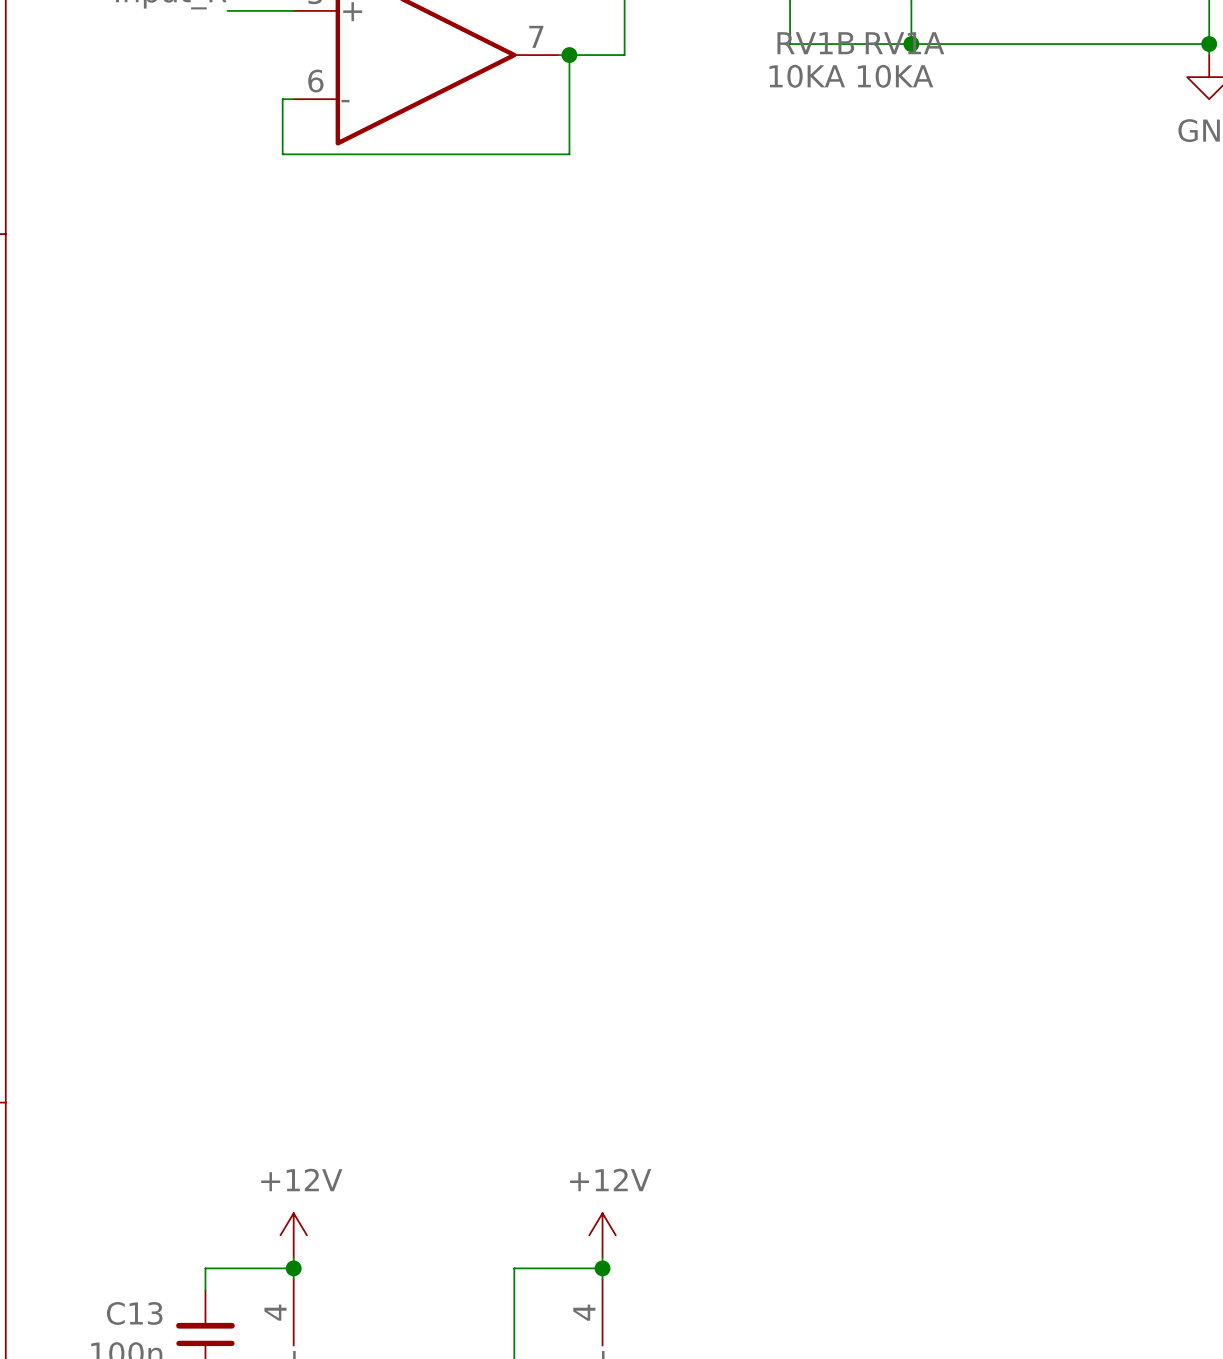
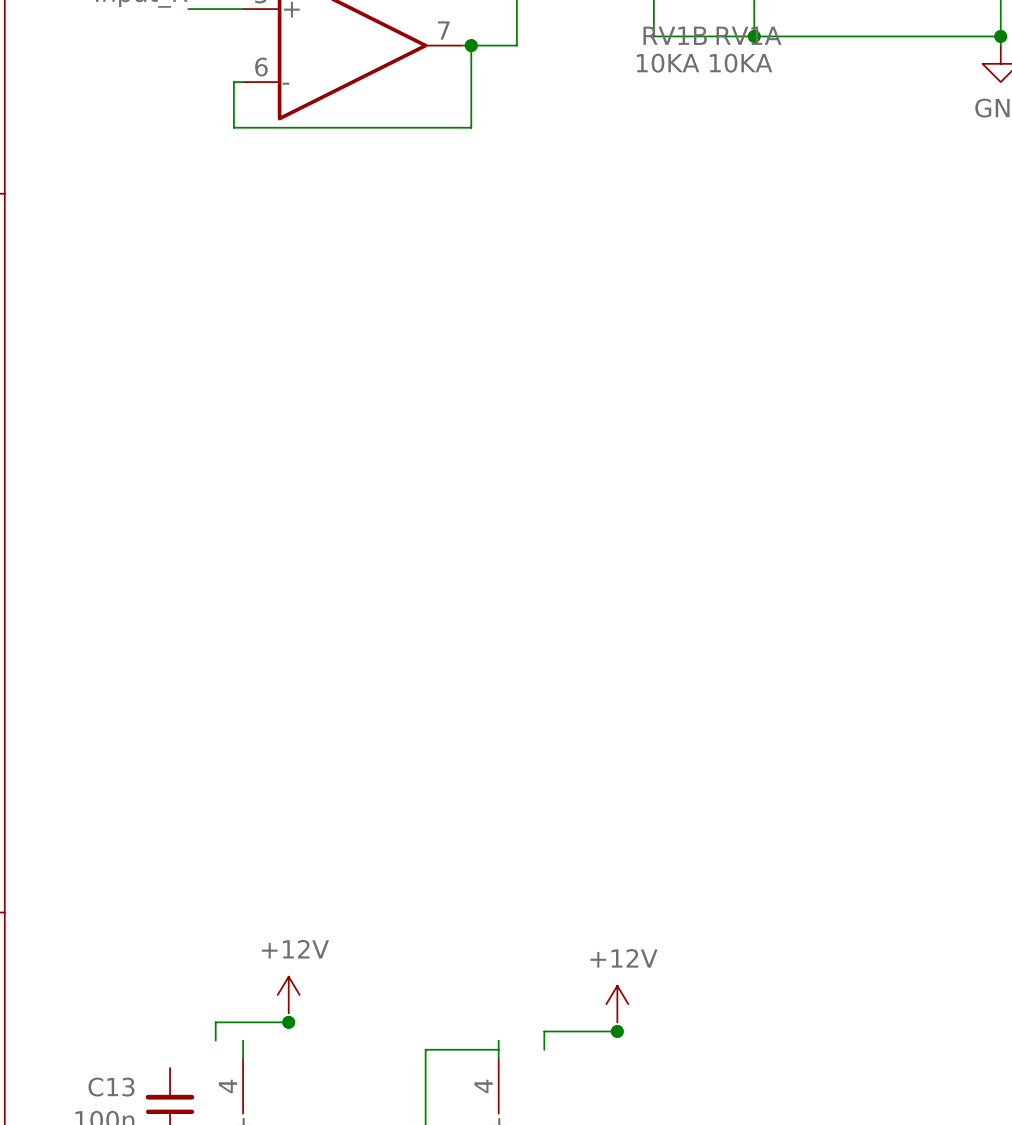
power symbol: none -> +12V (617, 1004)
power symbol position: +12V (293, 1235) -> +12V (288, 994)
junction: none -> (288, 1022)
power symbol: +12V (602, 1235) -> none
wire: none -> (617, 1031) (544, 1031) (544, 1049)
junction: none -> (617, 1031)
wire: (293, 1268) (205, 1268) (205, 1290) -> (288, 1022) (215, 1022) (215, 1040)
junction: (293, 1268) -> none
junction: (602, 1268) -> none

